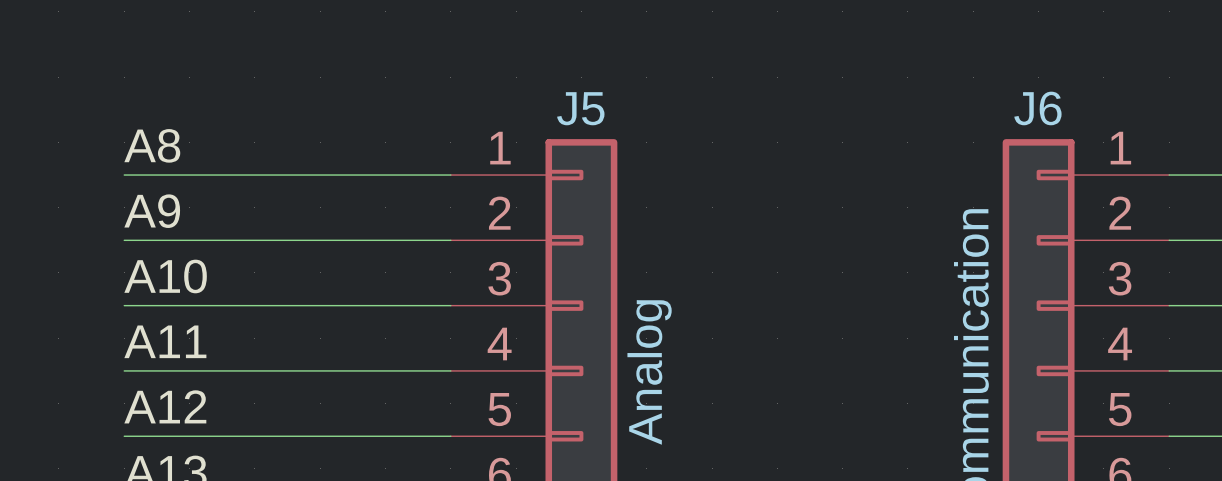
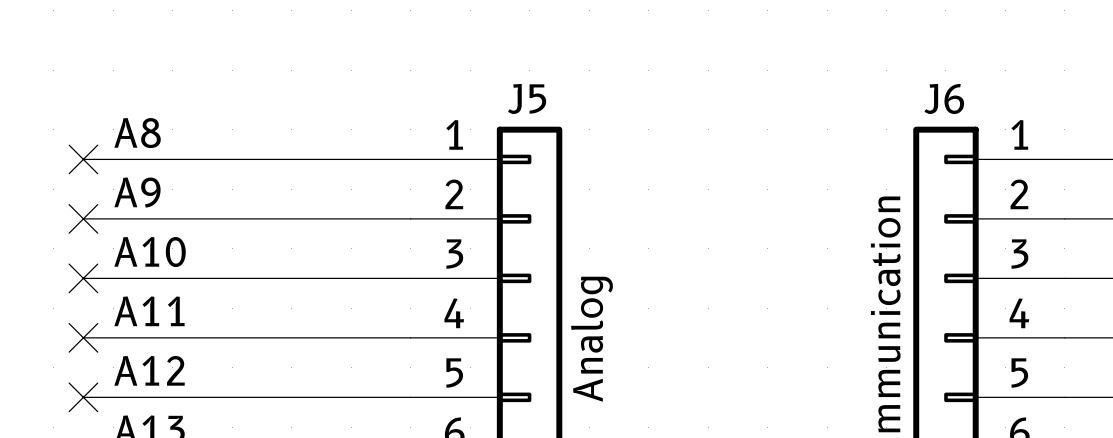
wire: none -> (83, 159) (113, 159)
no-connect mark: none -> (83, 159)
wire: none -> (83, 218) (113, 218)
no-connect mark: none -> (83, 218)
wire: none -> (83, 278) (113, 278)
no-connect mark: none -> (83, 278)
wire: none -> (83, 337) (113, 337)
no-connect mark: none -> (83, 337)
wire: none -> (83, 397) (113, 397)
no-connect mark: none -> (83, 397)

